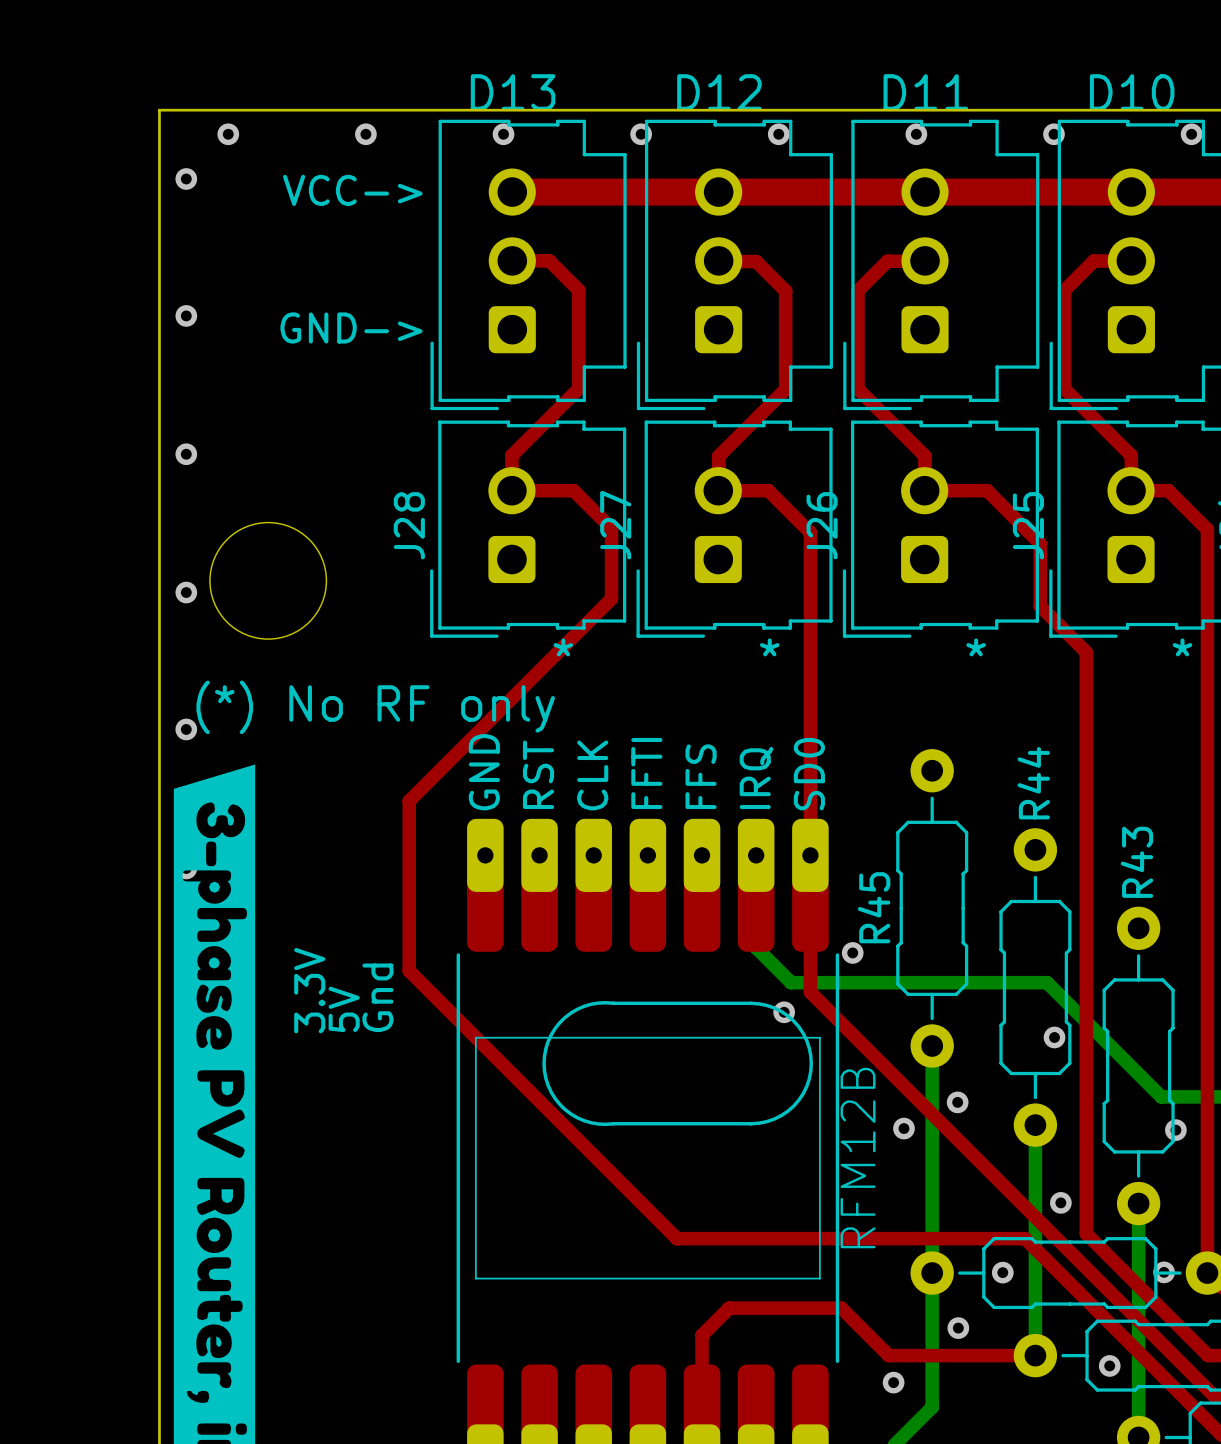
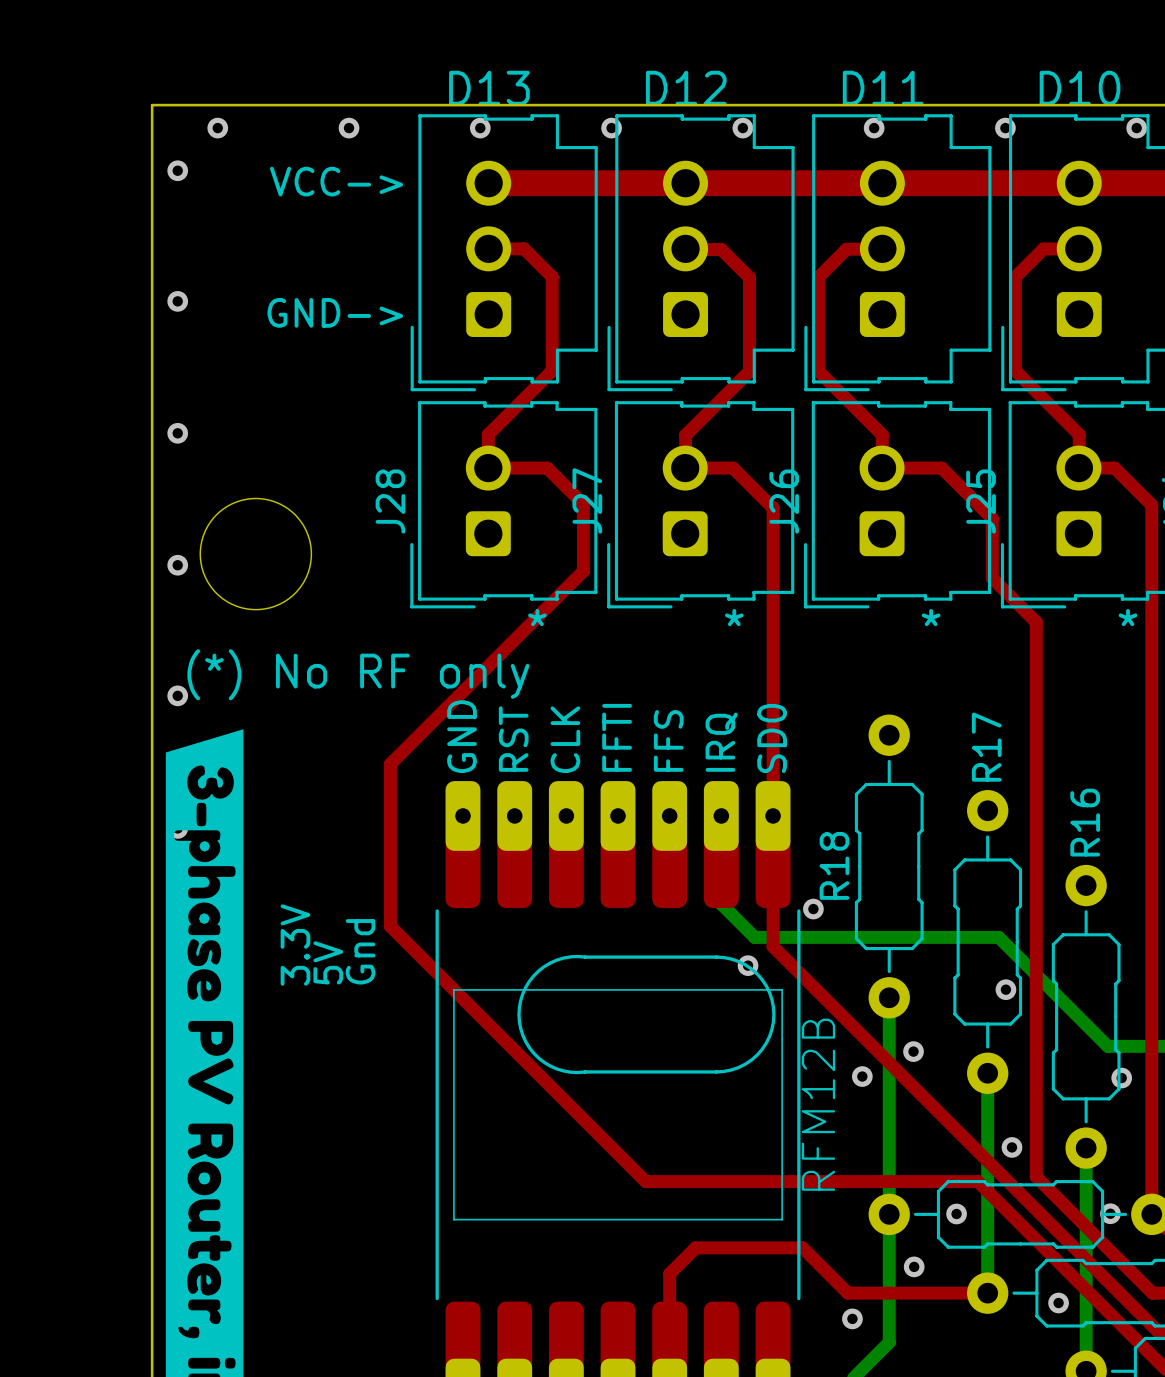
R44 name: R44 (1033, 783) -> R17 (986, 747)
R43 name: R43 (1136, 862) -> R16 (1085, 822)
R45 name: R45 (874, 907) -> R18 (834, 865)

